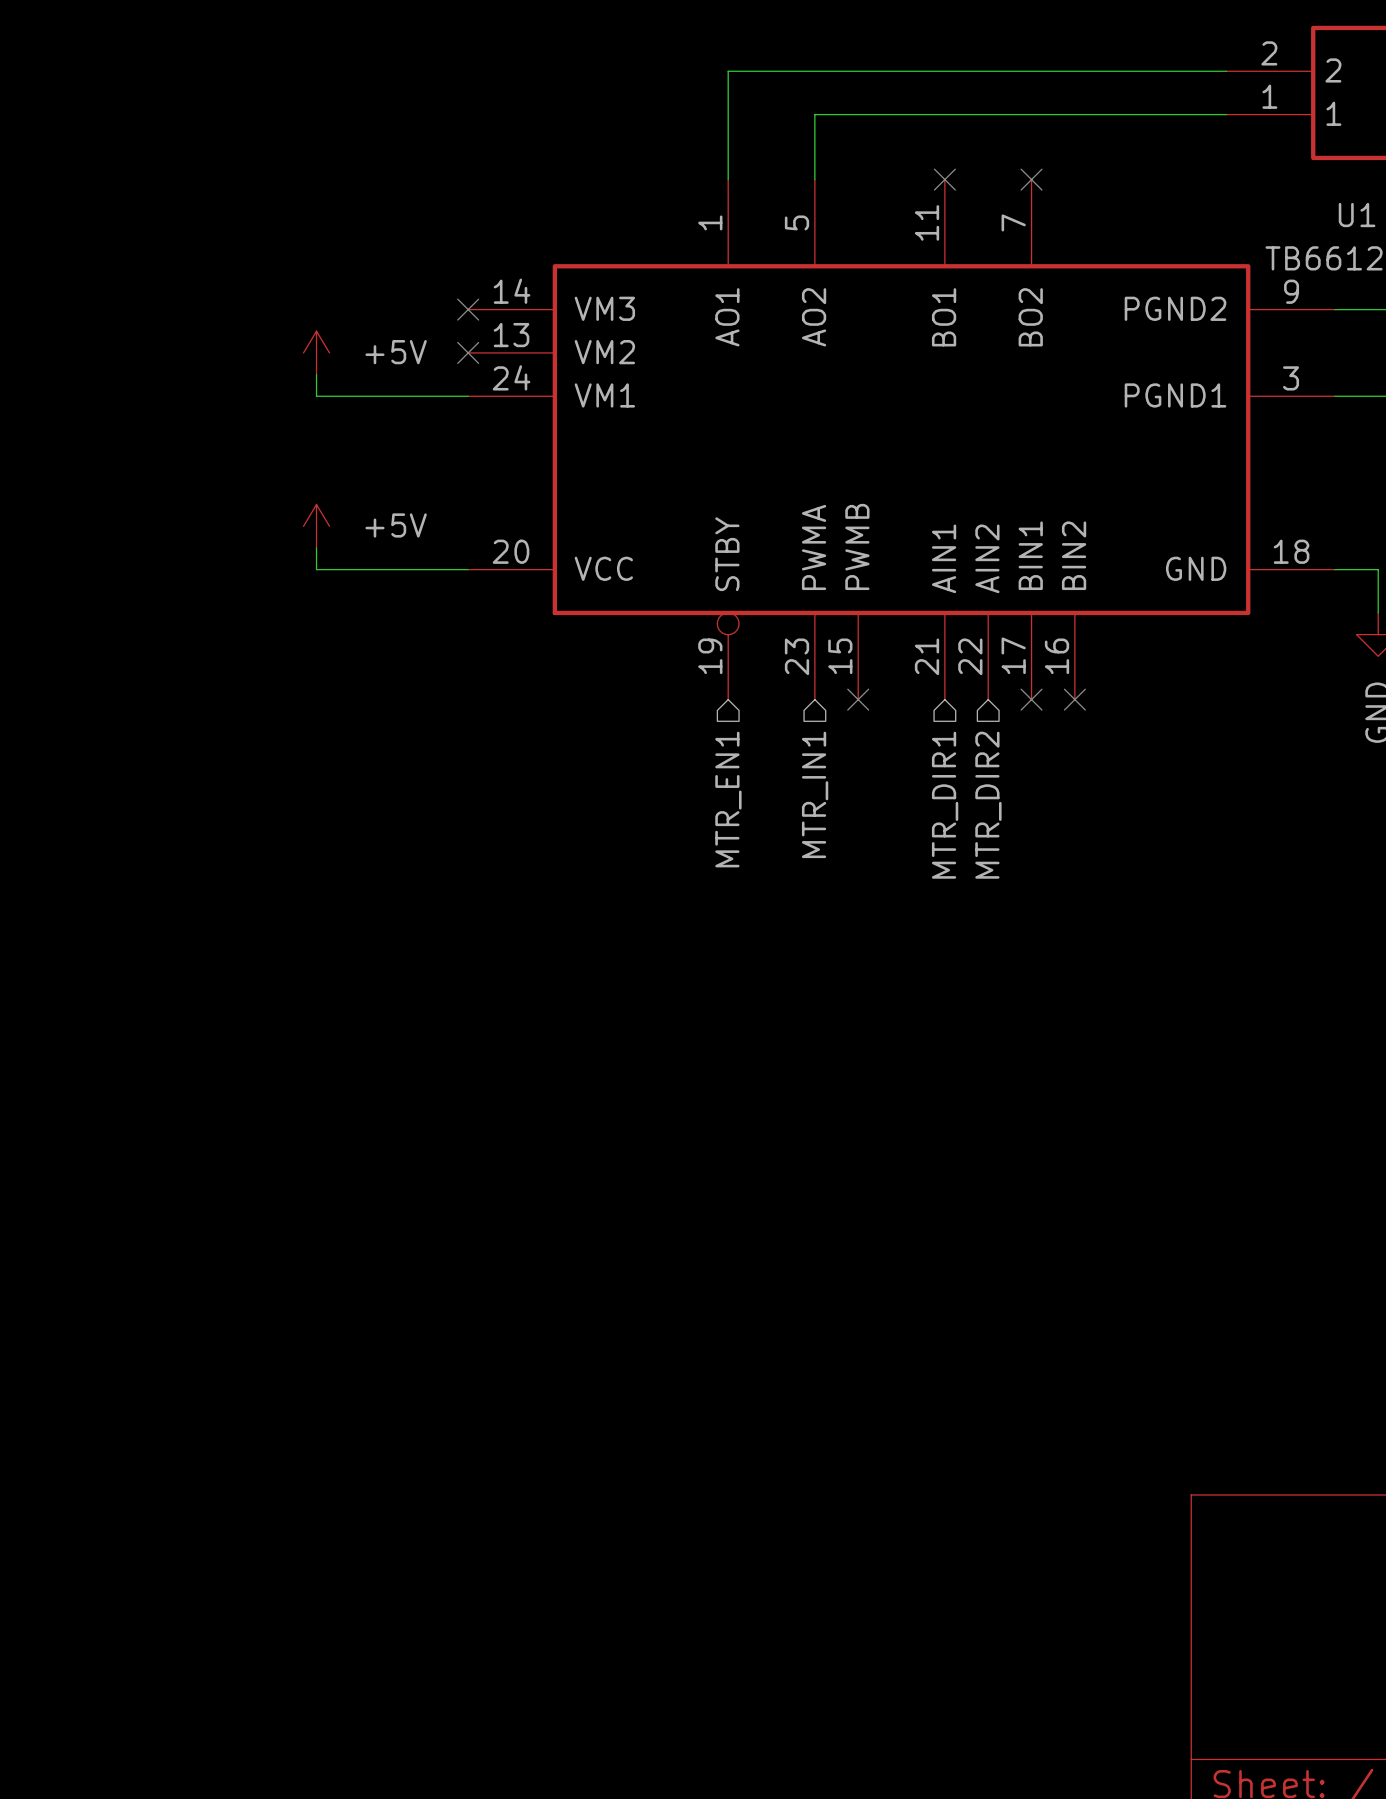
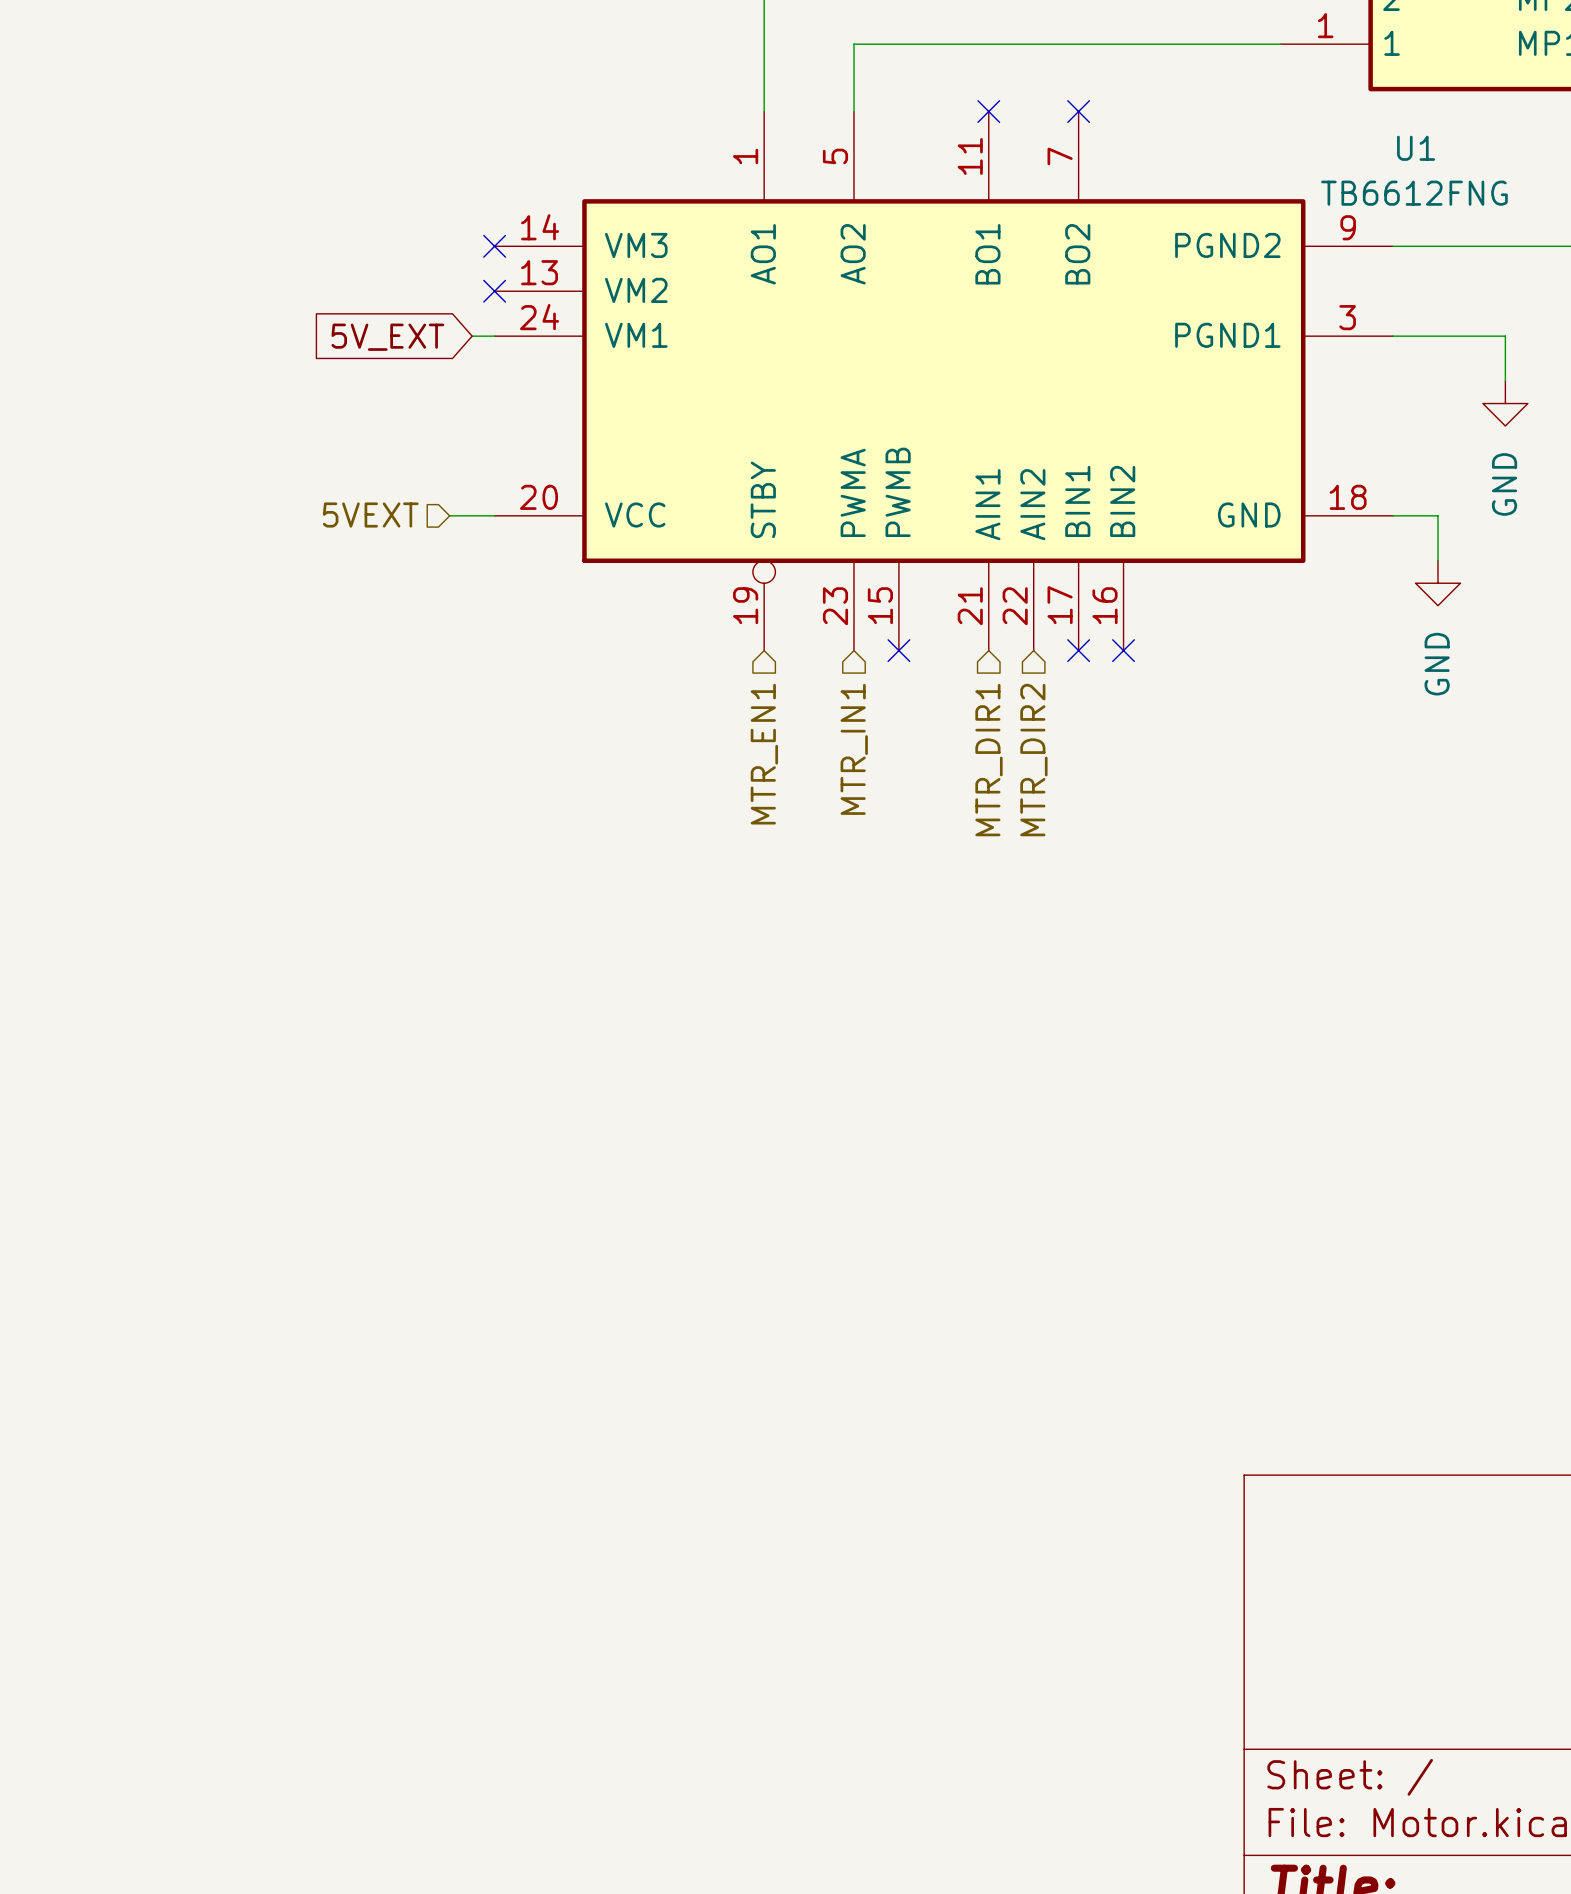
power symbol: +5V (316, 352) -> none
wire: (316, 374) (316, 396) (446, 396) -> none
global label: none -> 5V_EXT (387, 337)
power symbol: +5V (316, 526) -> none
wire: (316, 547) (316, 569) (424, 569) -> none
hierarchical label: none -> 5VEXT (370, 515)

